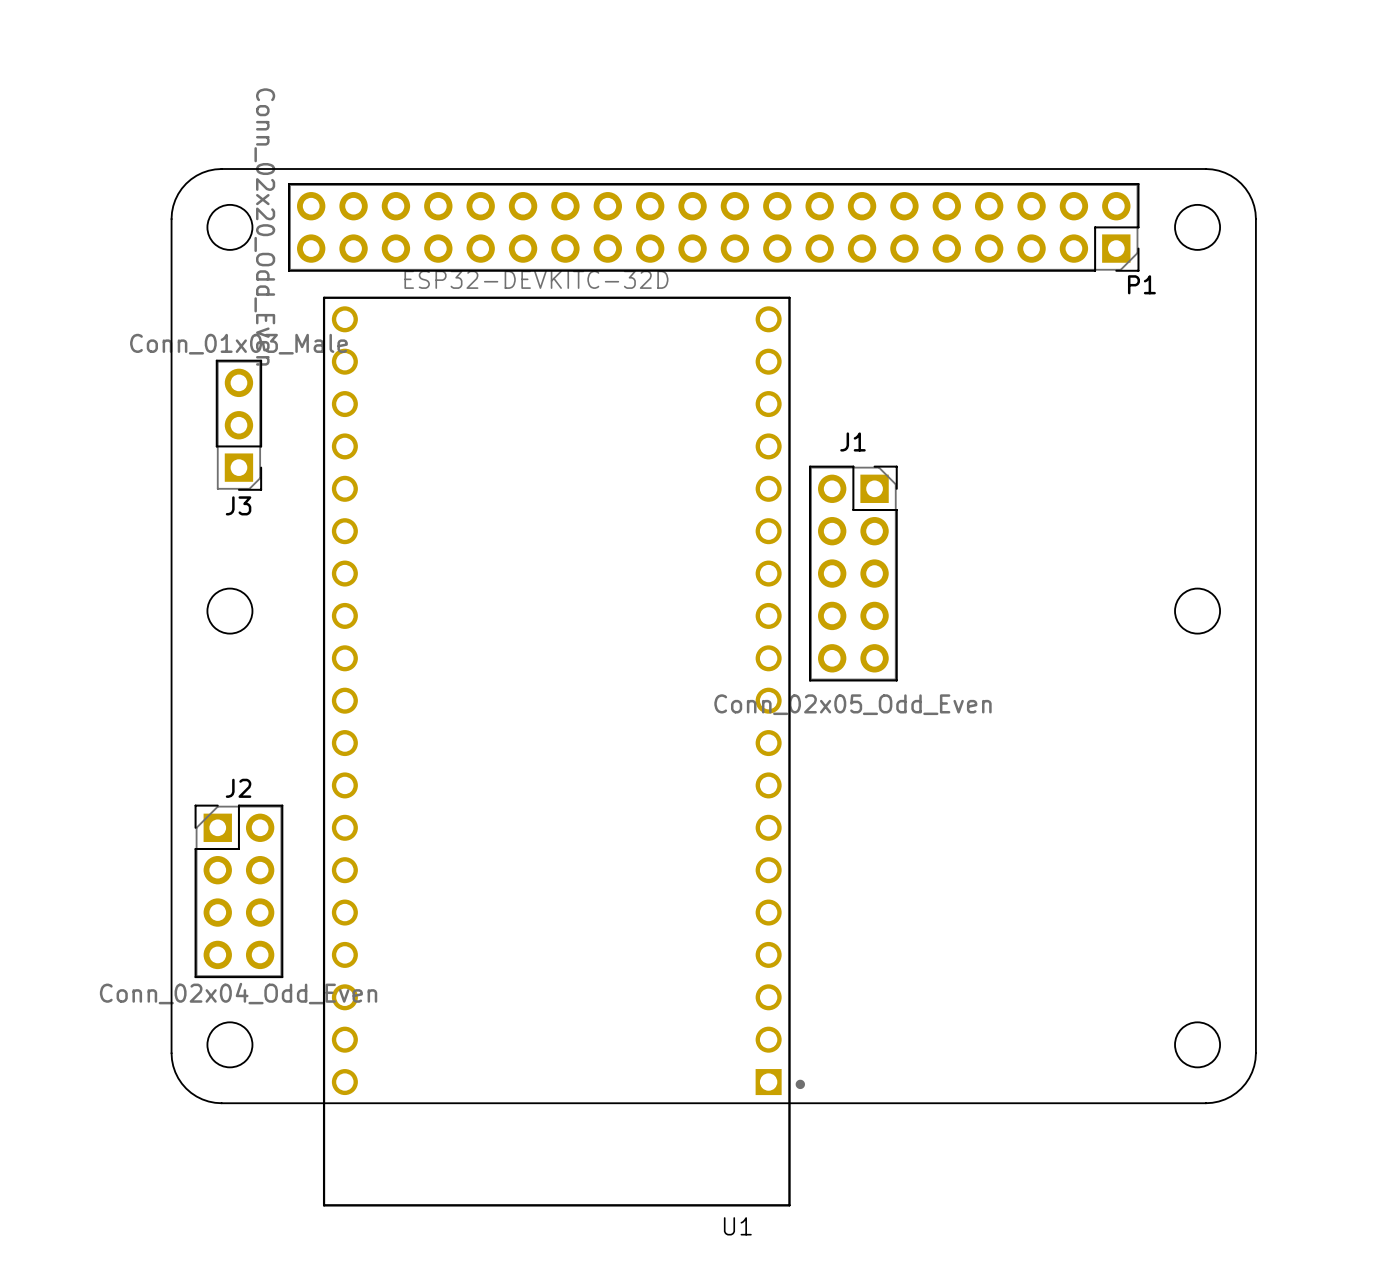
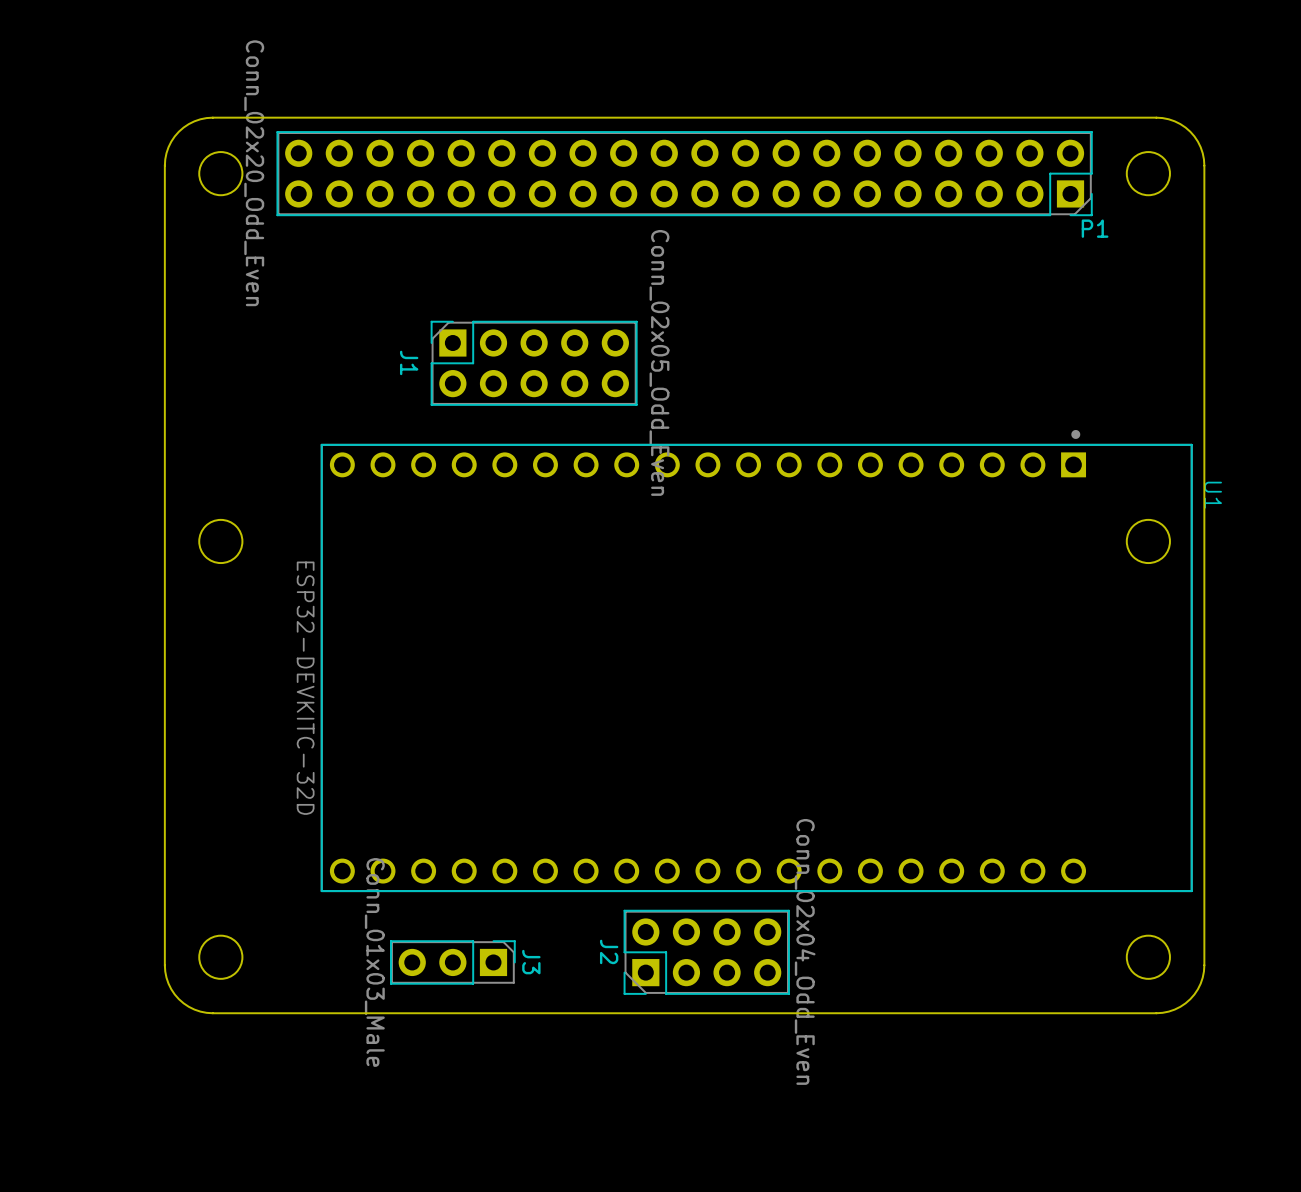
J3 rotation: 0° (238, 425) -> 90° counterclockwise (452, 962)
J3 position: (238, 425) -> (452, 962)
J1 rotation: 0° (853, 573) -> 90° counterclockwise (534, 363)
J1 position: (853, 573) -> (534, 363)
U1 rotation: 0° (563, 751) -> 90° counterclockwise (756, 661)
J2 rotation: 0° (238, 891) -> 90° counterclockwise (706, 952)
J2 position: (238, 891) -> (706, 952)

